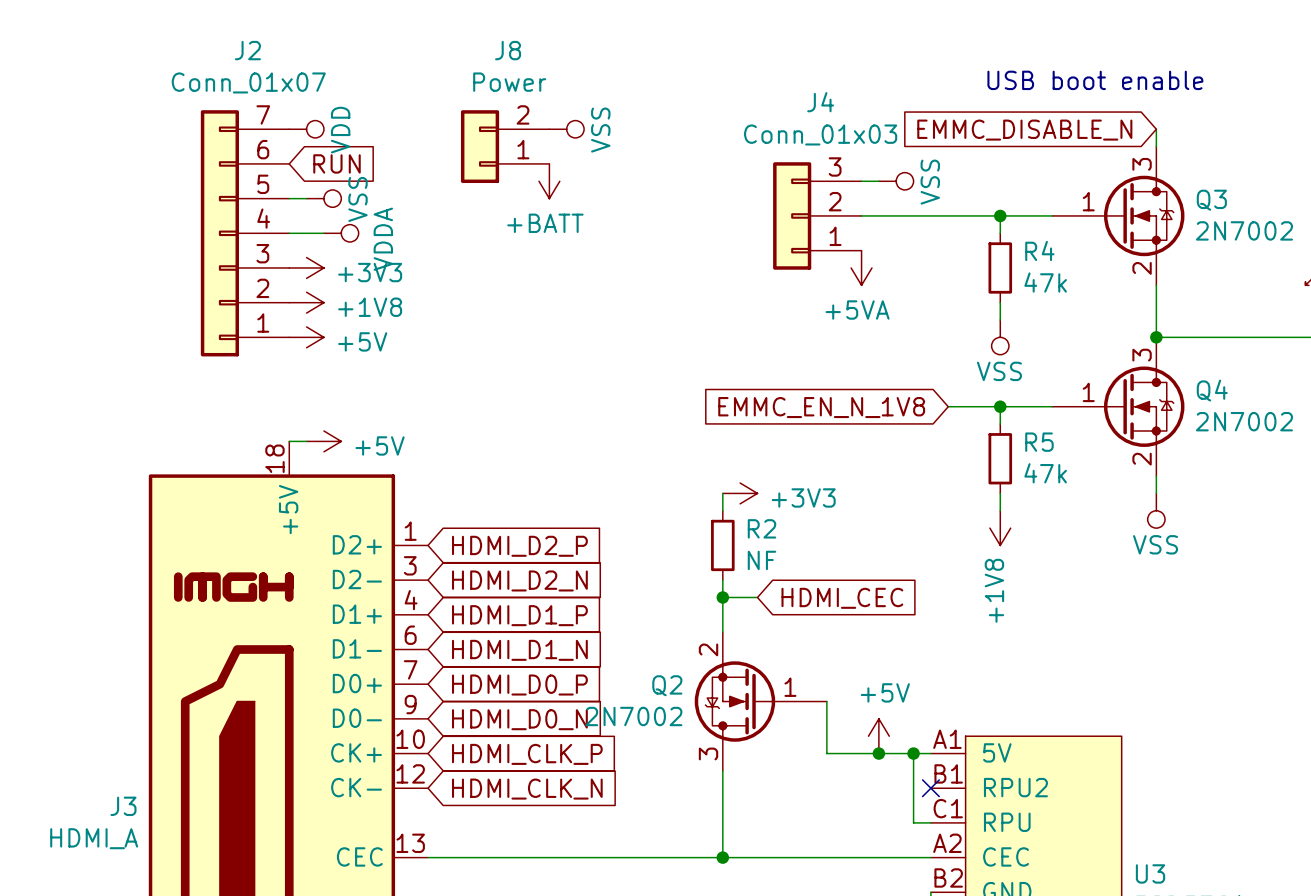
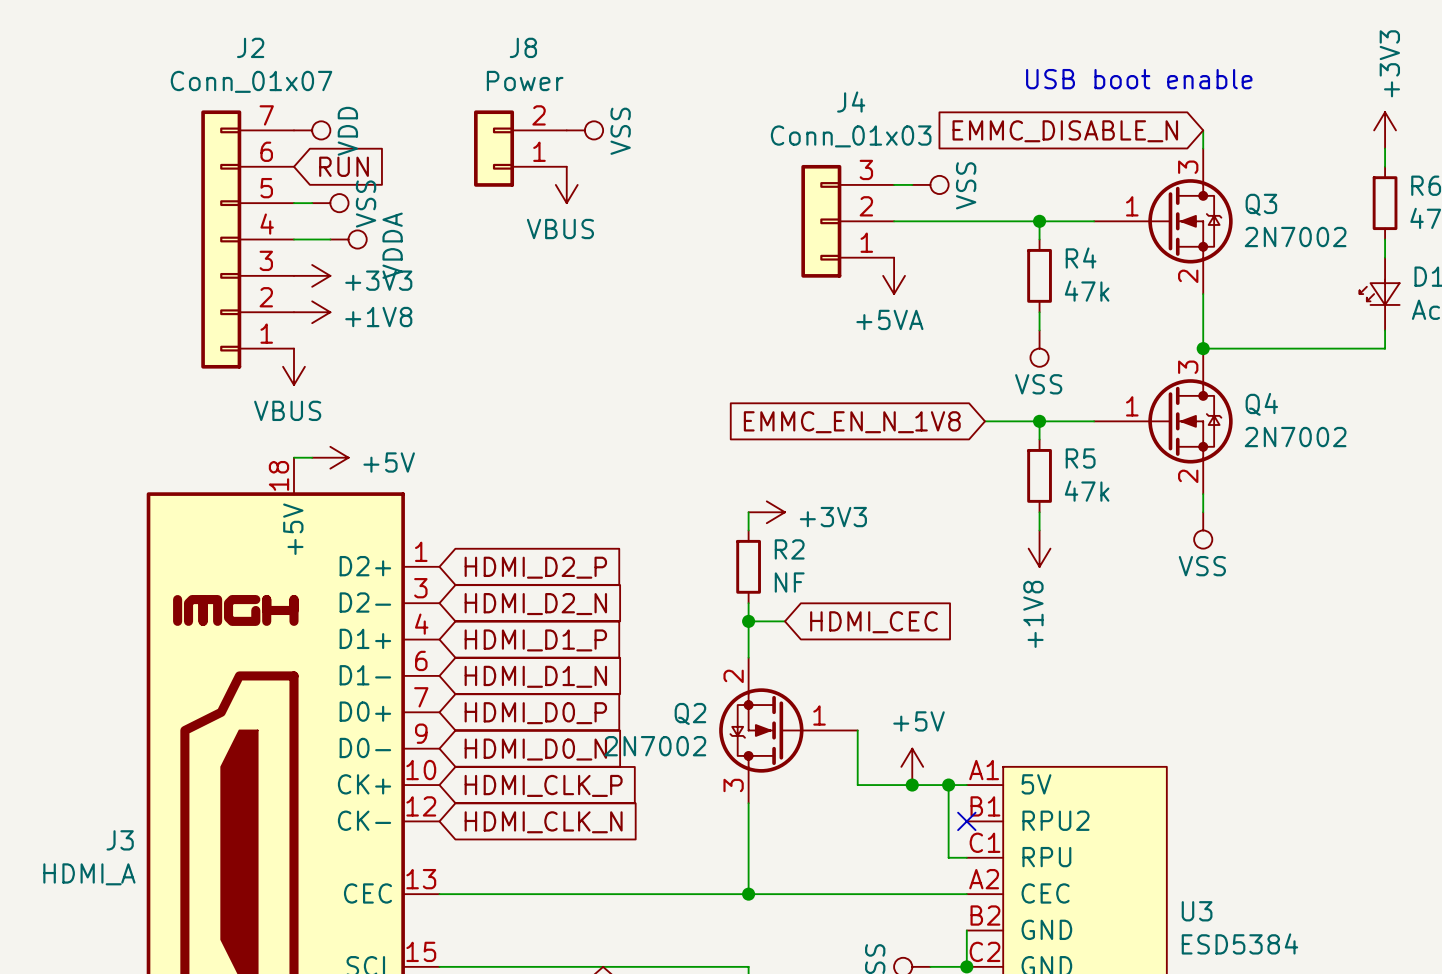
power symbol: +BATT (549, 181) -> VBUS (566, 184)
power symbol: +5V (306, 337) -> none
power symbol: none -> VBUS (293, 366)

